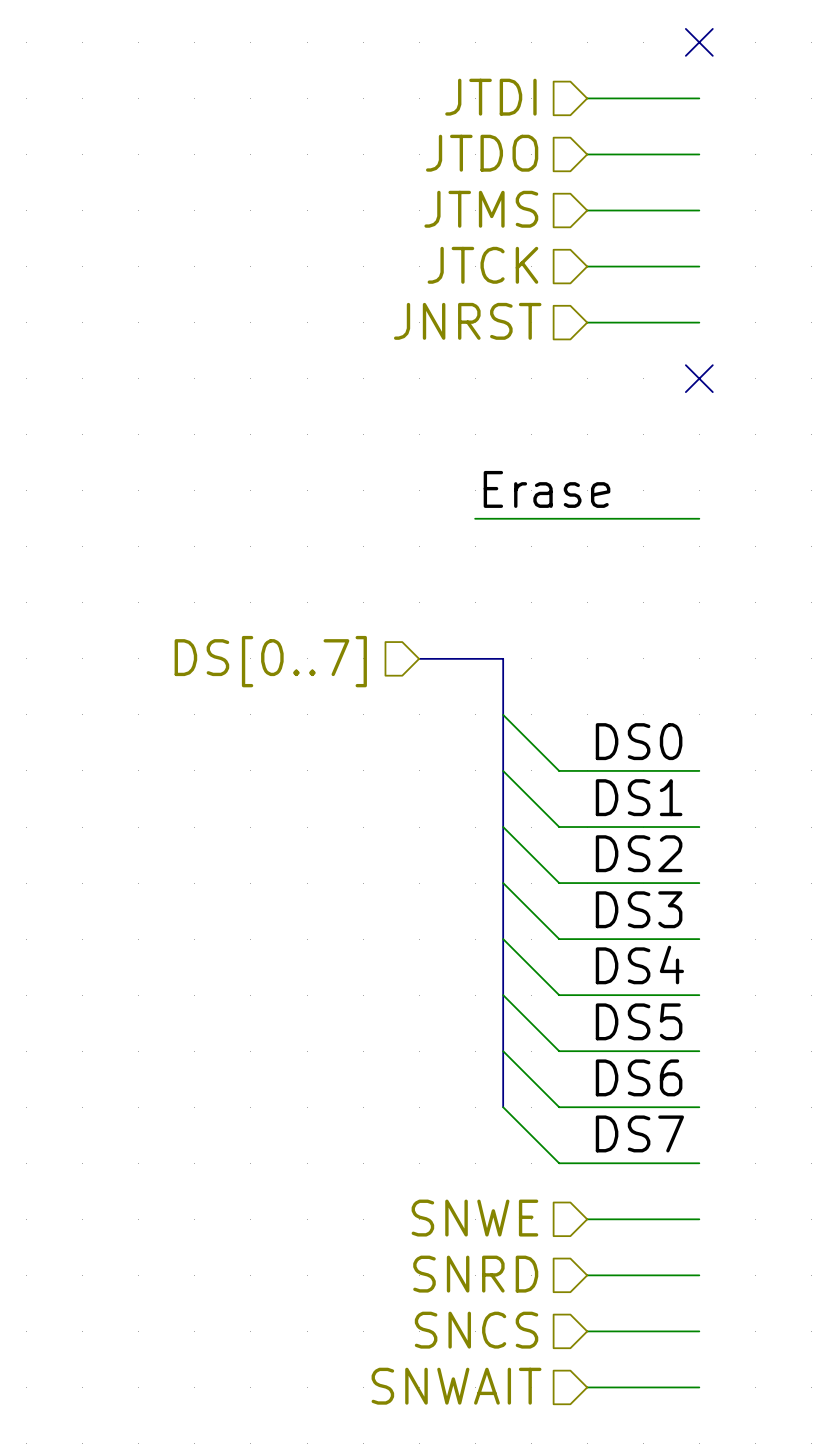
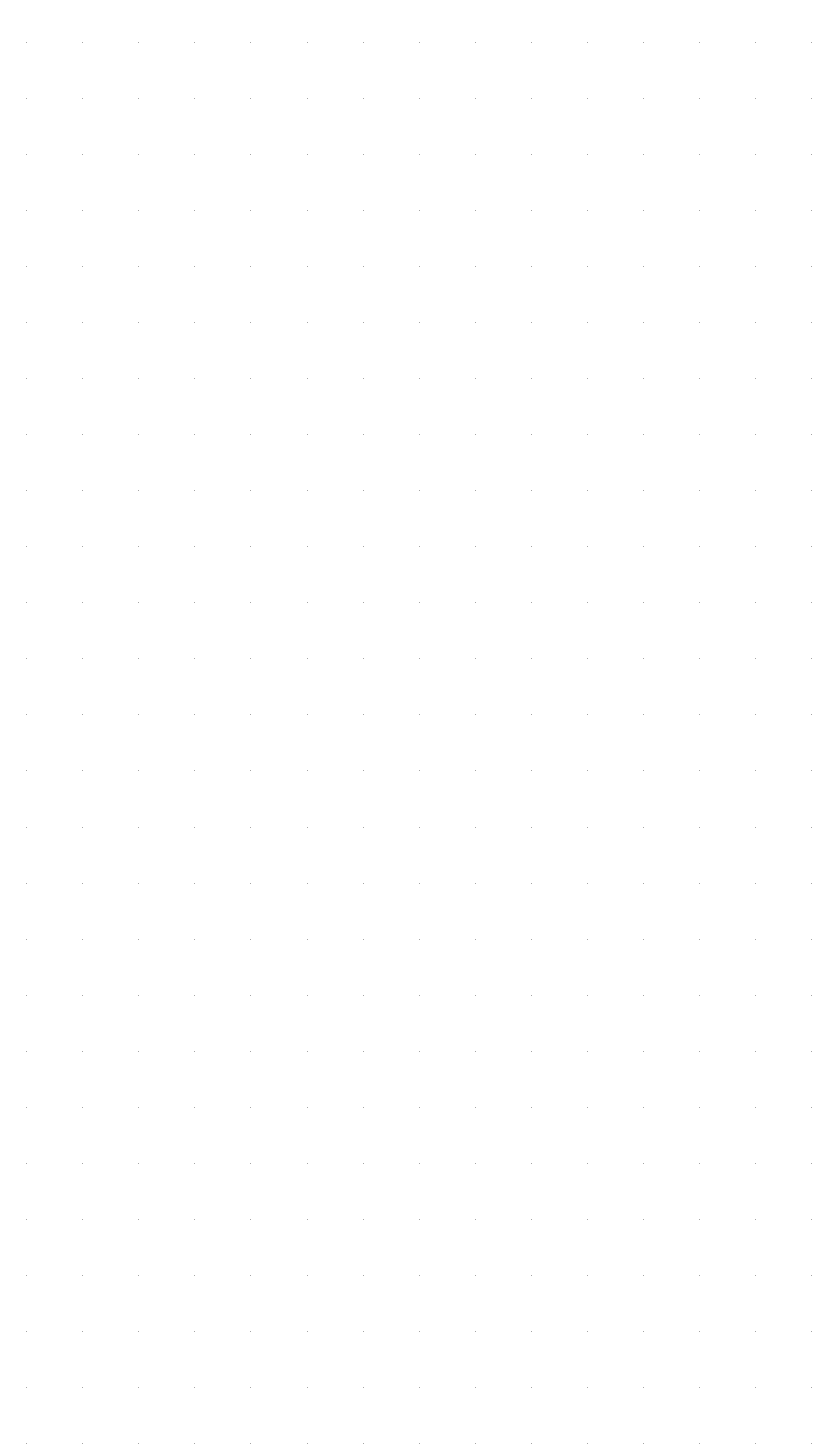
no-connect mark: (699, 42) -> none
hierarchical label: JTDI (490, 97) -> none
wire: (587, 98) (699, 98) -> none
hierarchical label: JTDO (482, 153) -> none
wire: (587, 154) (699, 154) -> none
hierarchical label: JTMS (481, 209) -> none
wire: (587, 210) (699, 210) -> none
hierarchical label: JTCK (482, 265) -> none
wire: (587, 266) (699, 266) -> none
hierarchical label: JNRST (467, 321) -> none
wire: (587, 322) (699, 322) -> none
no-connect mark: (699, 378) -> none
label: Erase (547, 489) -> none
wire: (475, 518) (699, 518) -> none
bus: (419, 658) (503, 658) (503, 1107) -> none
hierarchical label: DS[0..7] (270, 661) -> none
wire: (503, 714) (559, 770) (699, 770) -> none
label: DS0 (639, 741) -> none
wire: (503, 770) (559, 827) (699, 827) -> none
label: DS1 (639, 797) -> none
wire: (503, 827) (559, 883) (699, 883) -> none
label: DS2 (639, 853) -> none
wire: (503, 883) (559, 939) (699, 939) -> none
label: DS3 (639, 909) -> none
wire: (503, 939) (559, 995) (699, 995) -> none
label: DS4 (639, 965) -> none
wire: (503, 995) (559, 1051) (699, 1051) -> none
label: DS5 (639, 1021) -> none
wire: (503, 1051) (559, 1107) (699, 1107) -> none
label: DS6 (639, 1077) -> none
wire: (503, 1107) (559, 1163) (699, 1163) -> none
label: DS7 (639, 1133) -> none
hierarchical label: SNWE (474, 1218) -> none
wire: (587, 1219) (699, 1219) -> none
hierarchical label: SNRD (475, 1274) -> none
wire: (587, 1275) (699, 1275) -> none
hierarchical label: SNCS (476, 1330) -> none
wire: (587, 1331) (699, 1331) -> none
hierarchical label: SNWAIT (456, 1386) -> none
wire: (587, 1387) (699, 1387) -> none

